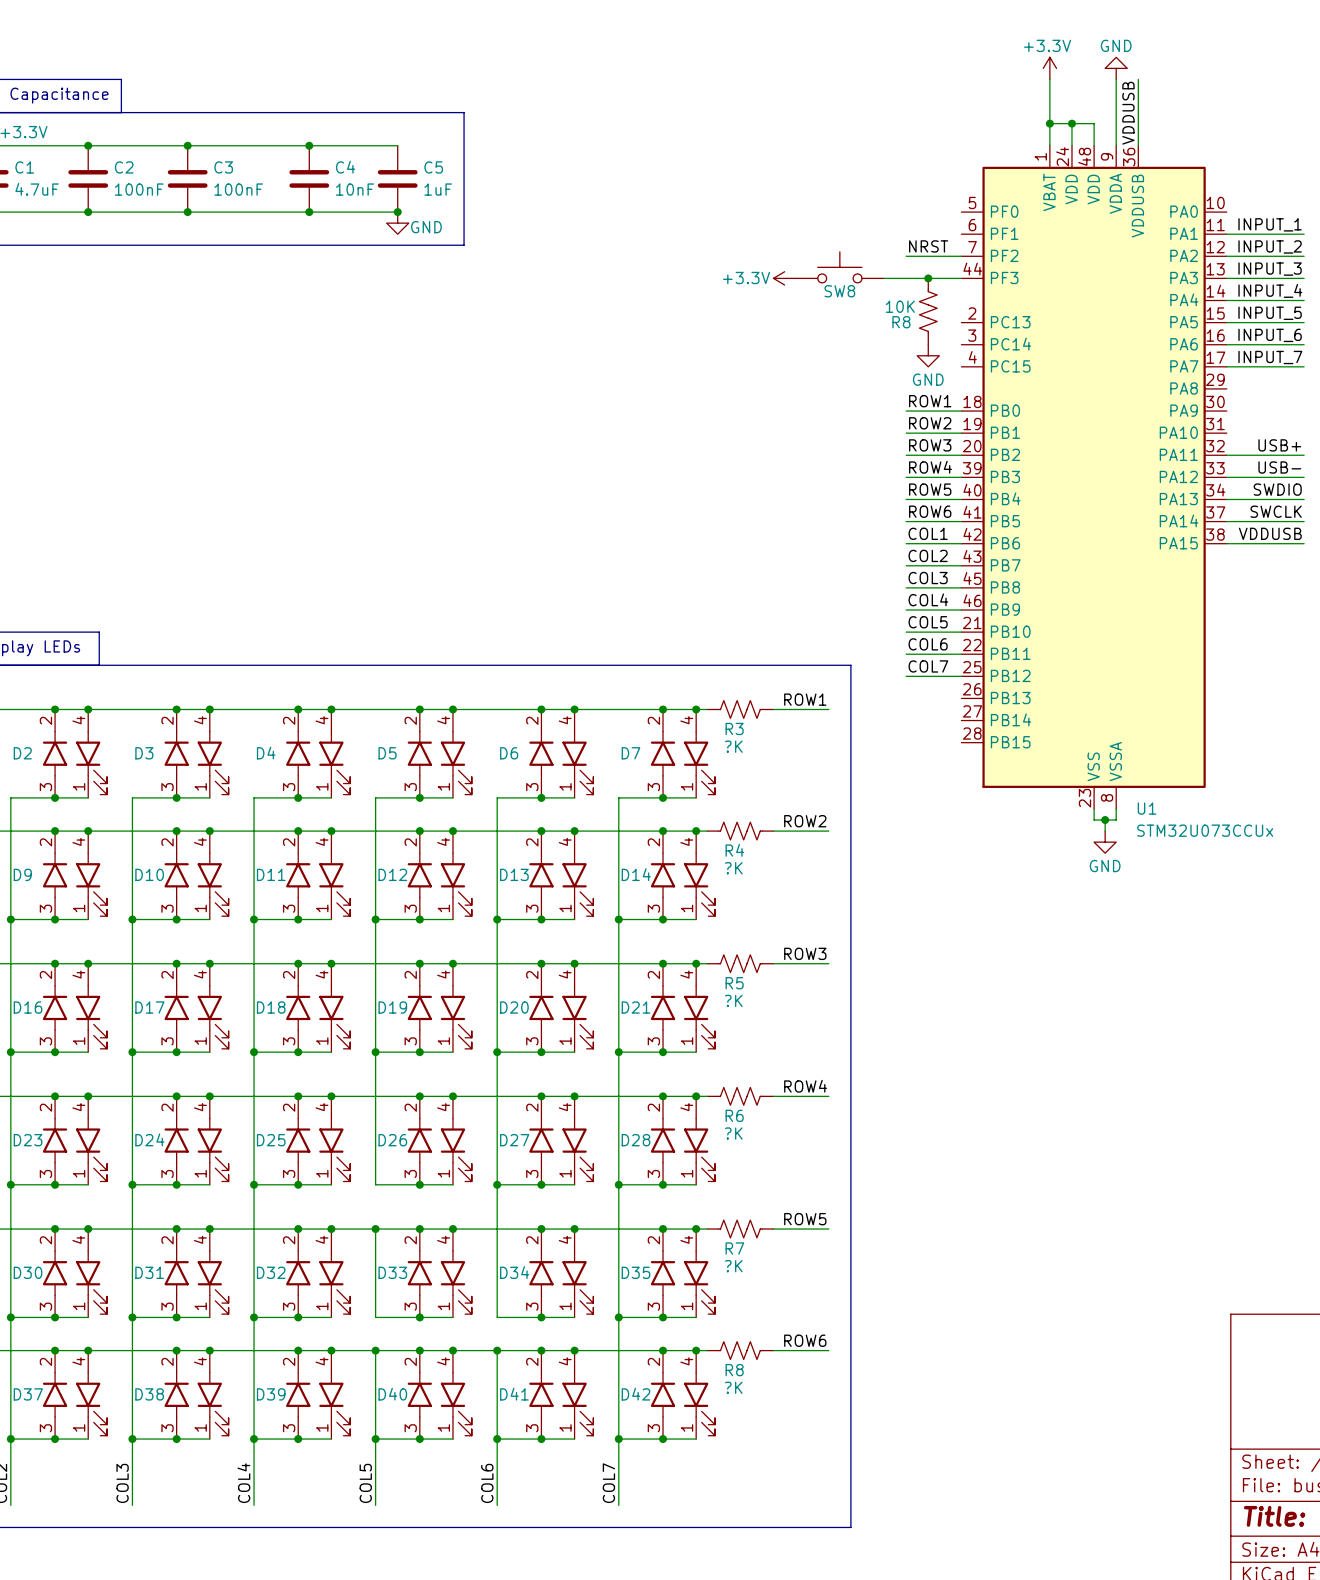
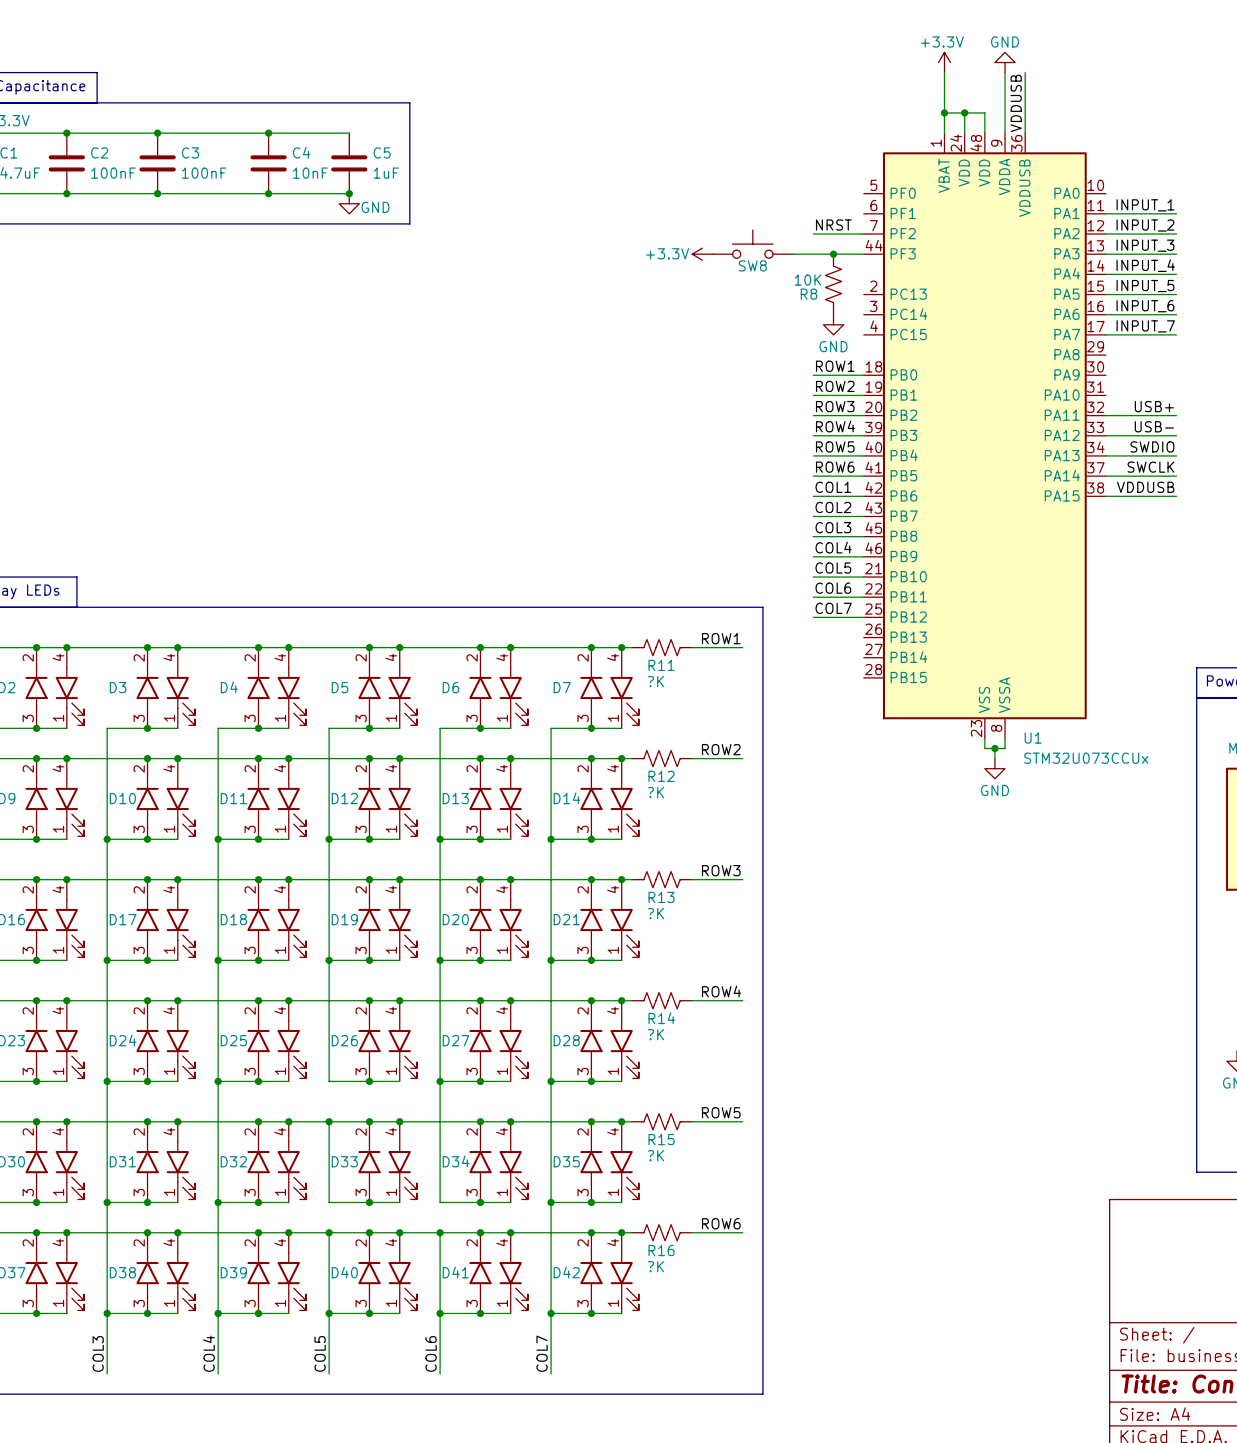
R3 name: R3 (734, 728) -> R11 (661, 665)
R4 name: R4 (734, 850) -> R12 (661, 776)
R5 name: R5 (734, 983) -> R13 (661, 897)
R6 name: R6 (734, 1115) -> R14 (661, 1018)
R7 name: R7 (734, 1248) -> R15 (661, 1139)
R8 name: R8 (734, 1370) -> R16 (661, 1250)

